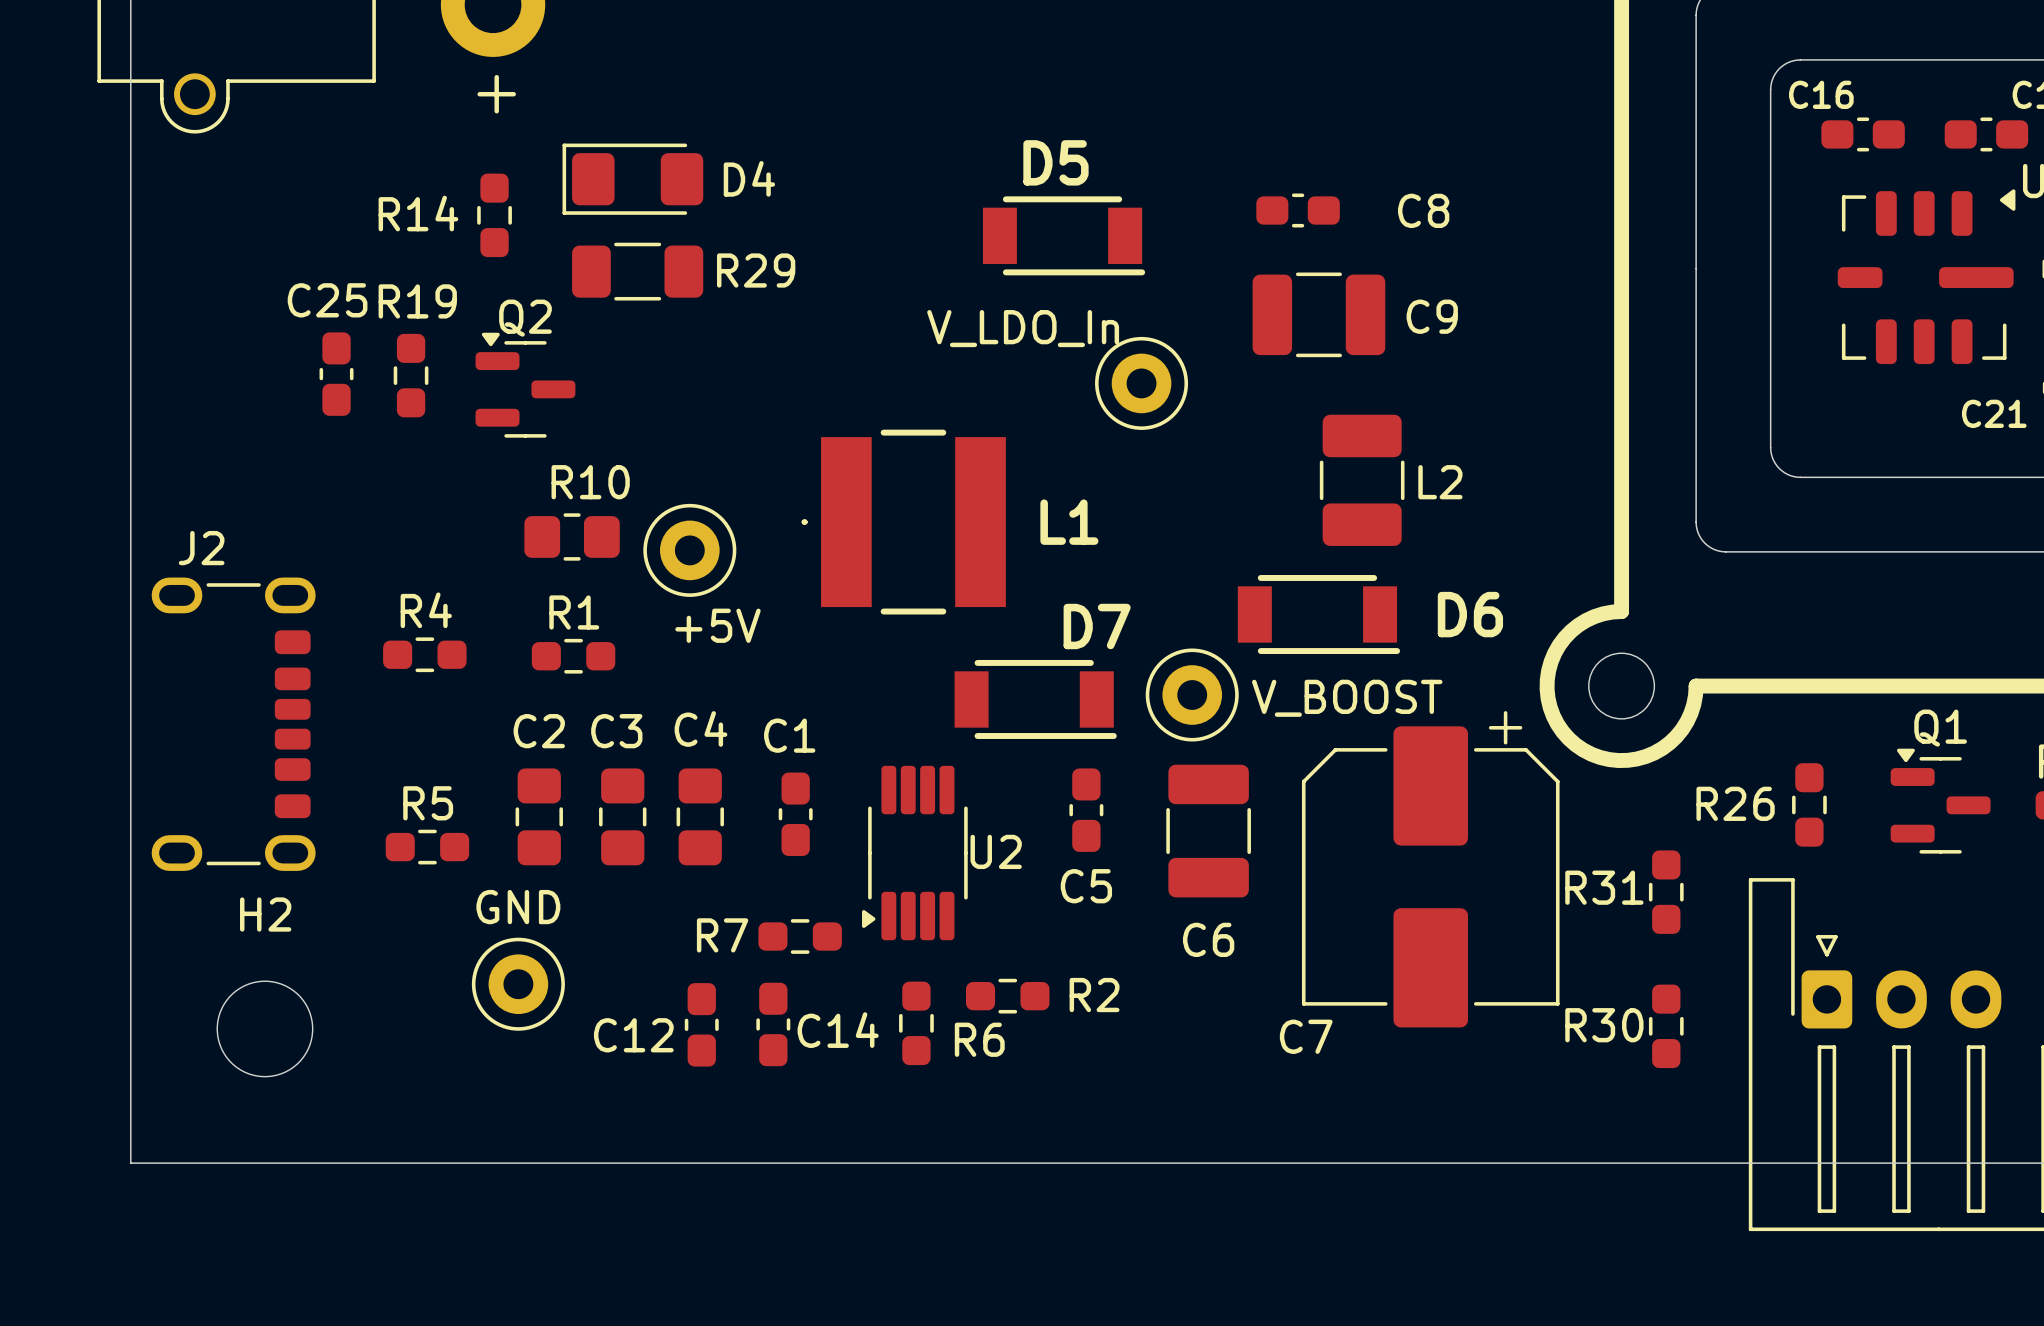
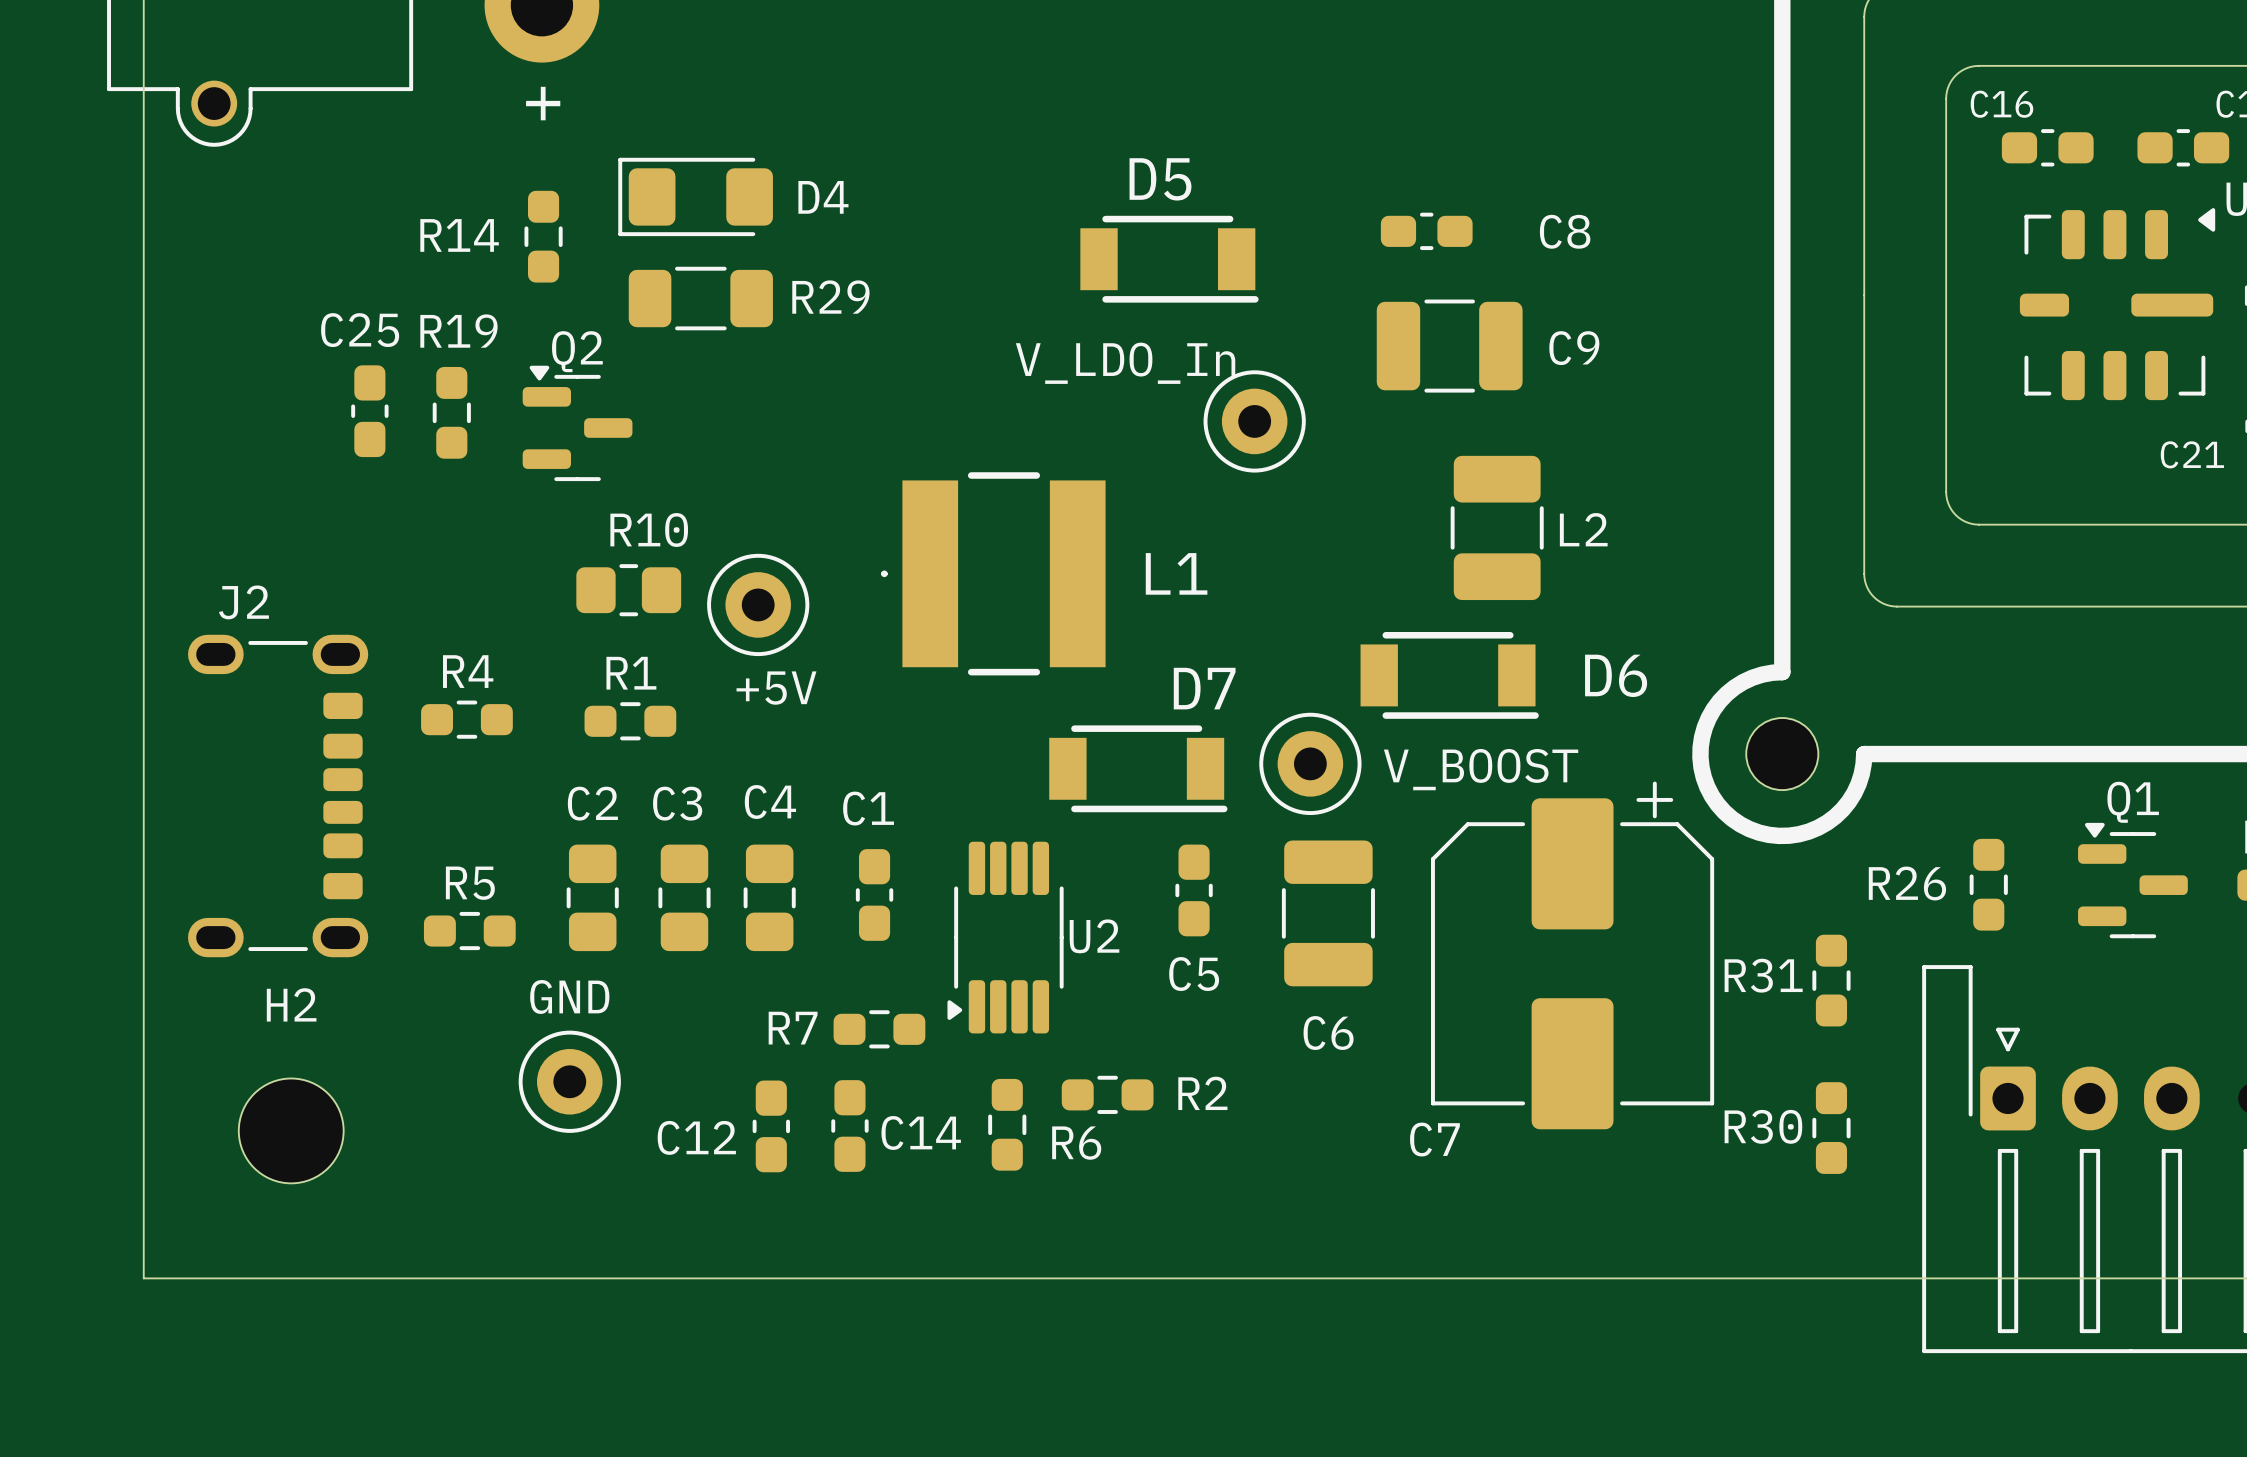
J2 position: (233, 724) -> (278, 796)

